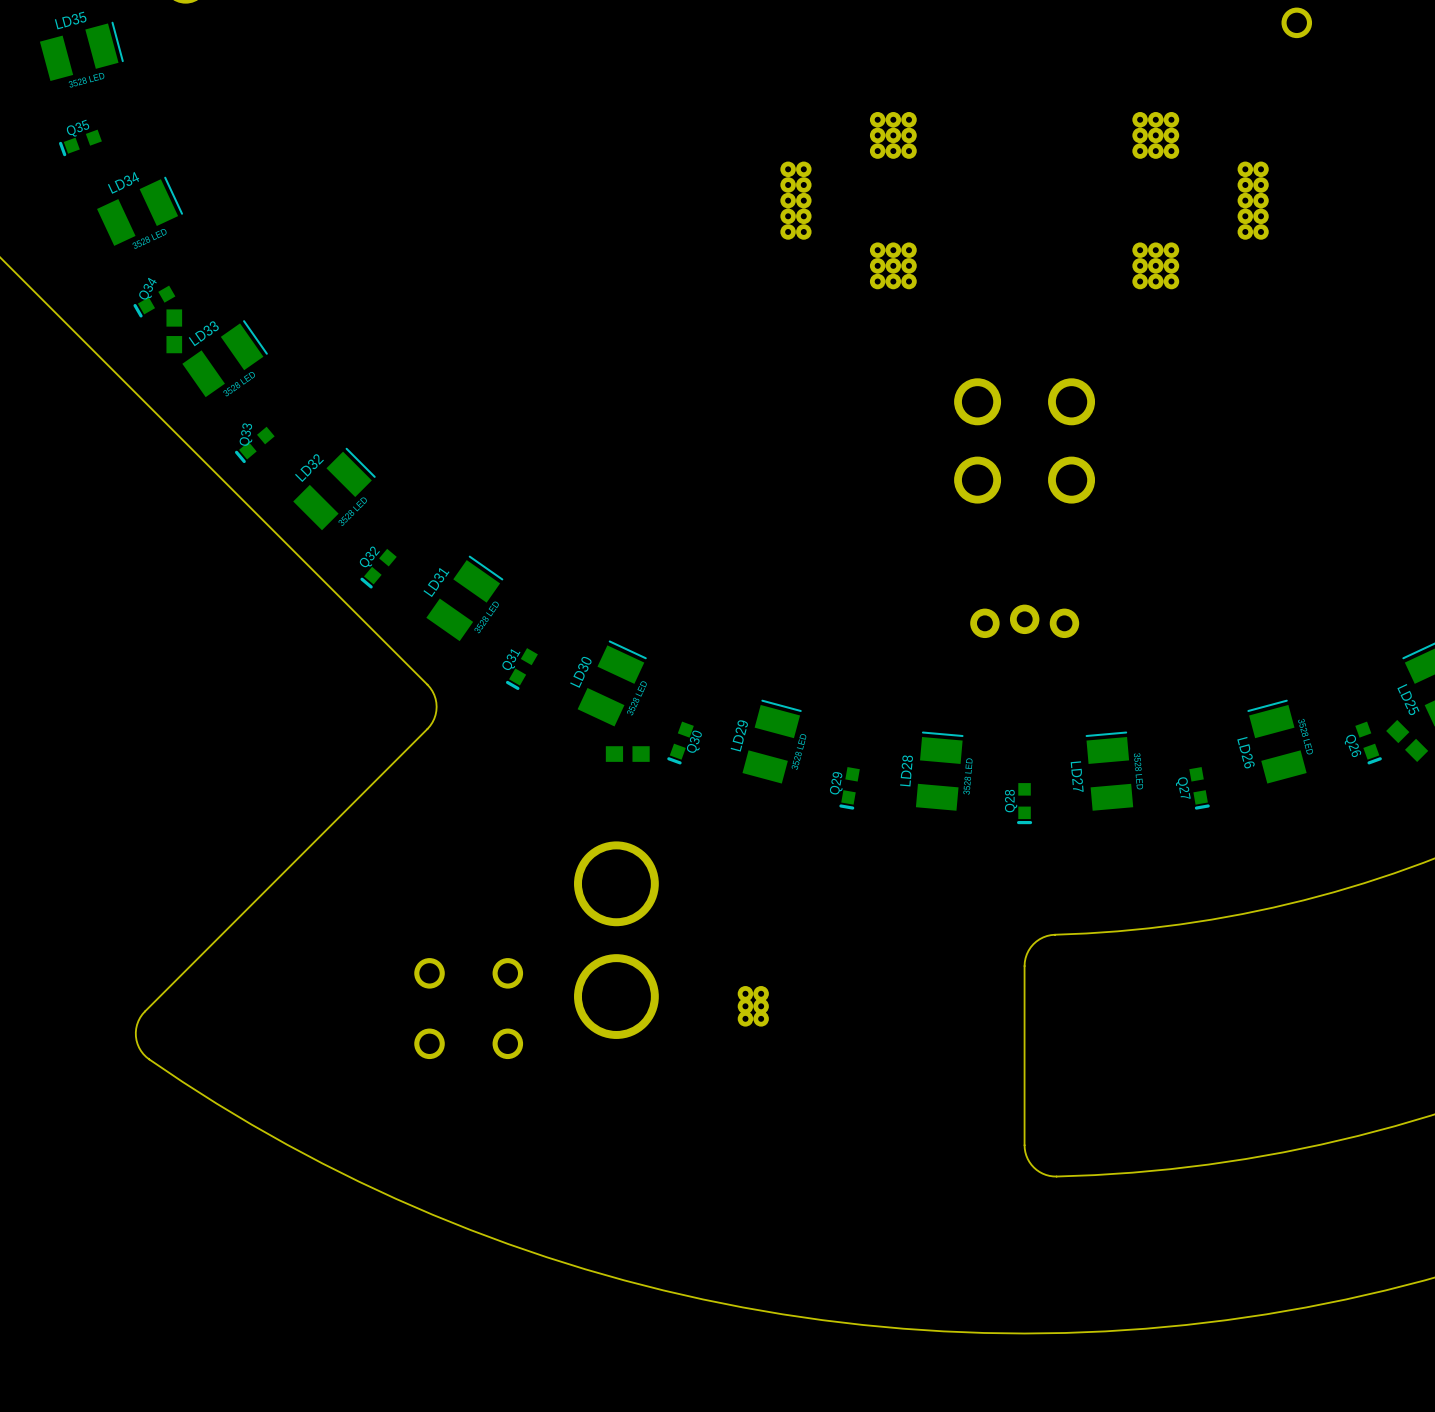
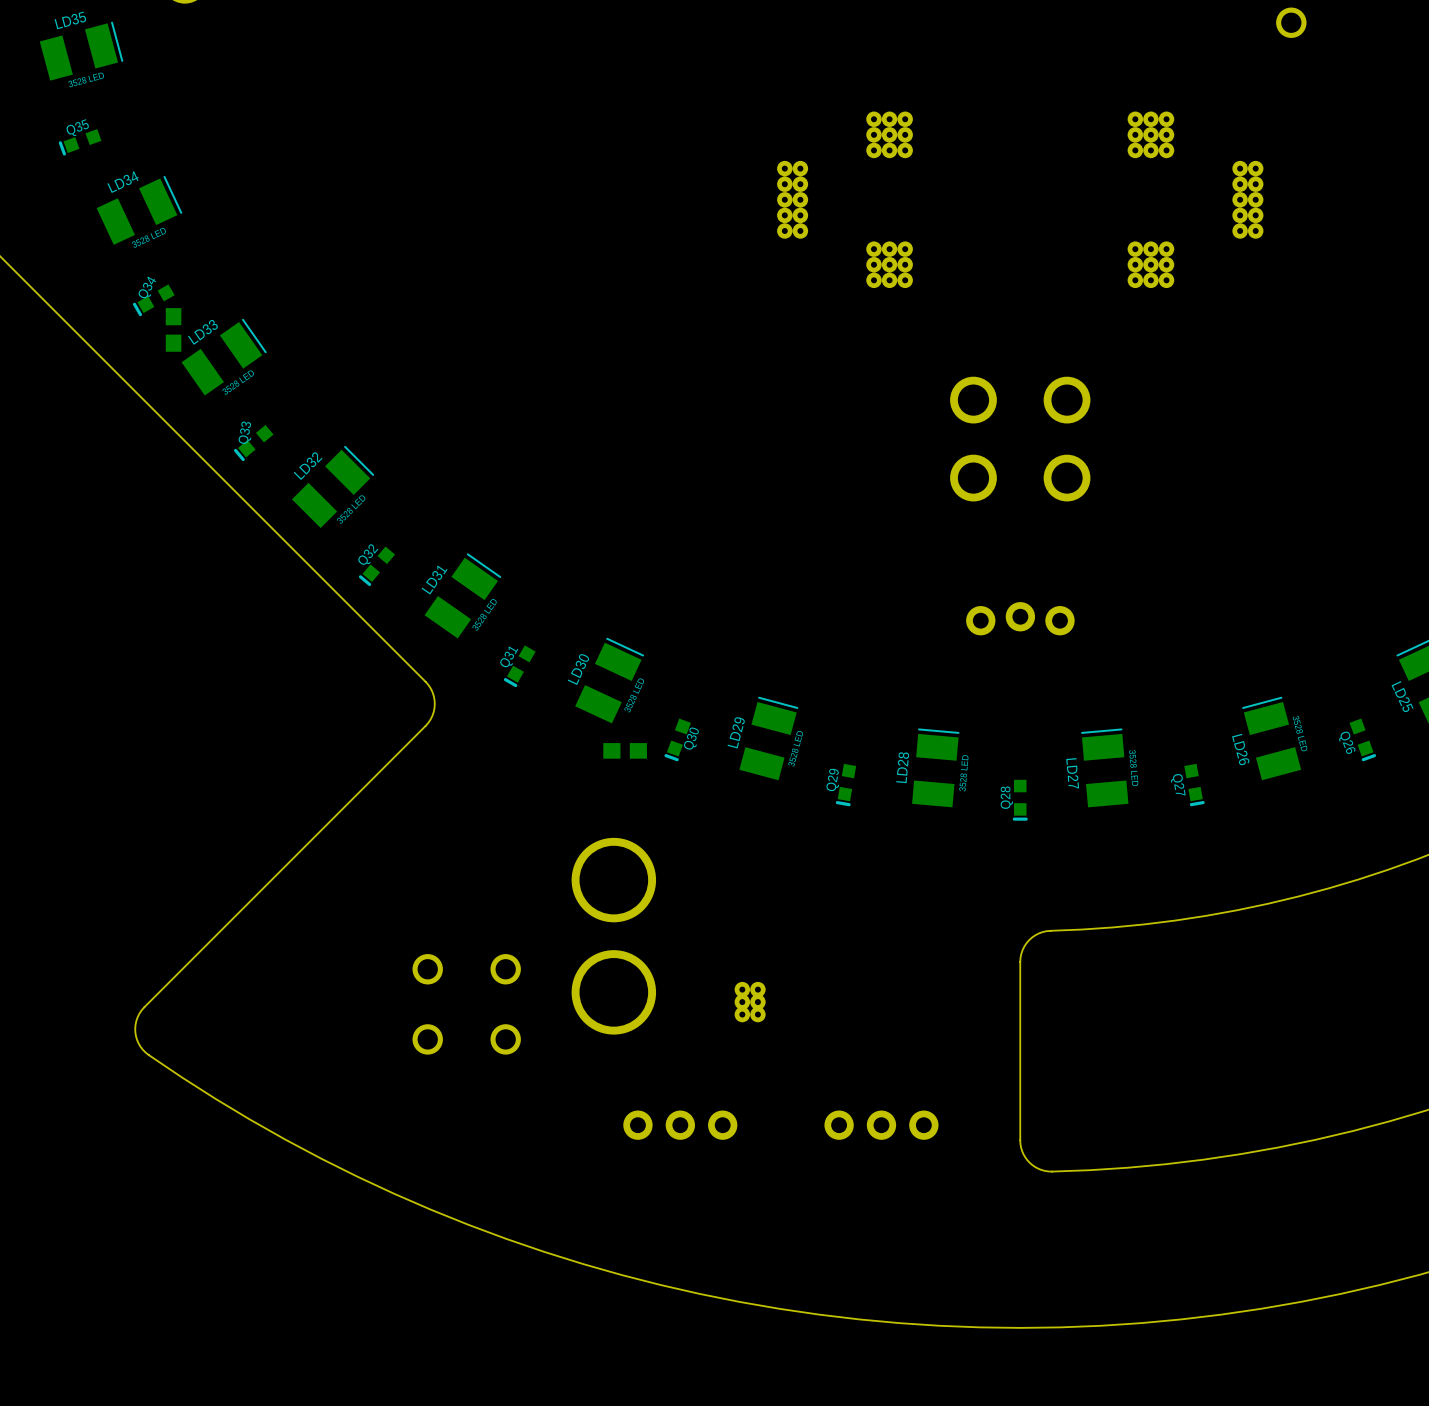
part: (1407, 740) -> none
part: none -> (680, 1125)
part: none -> (881, 1125)

